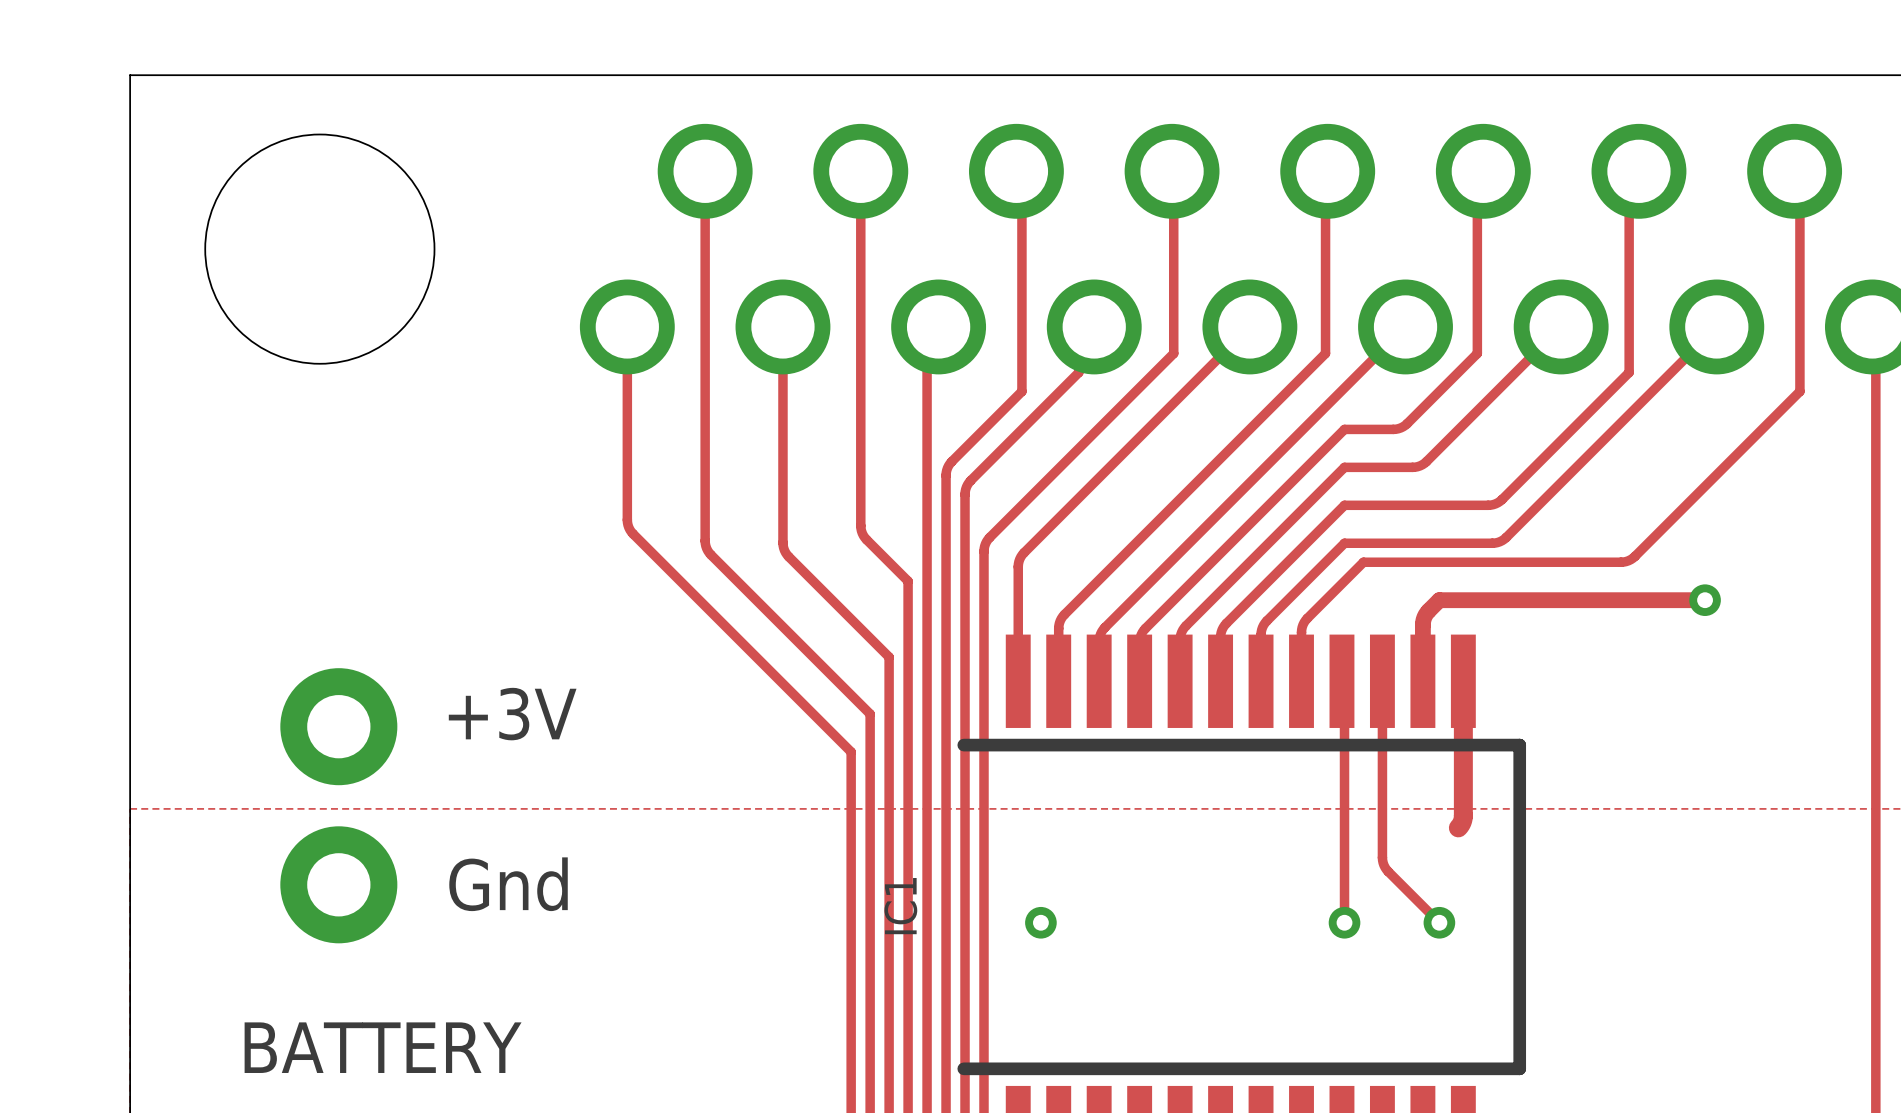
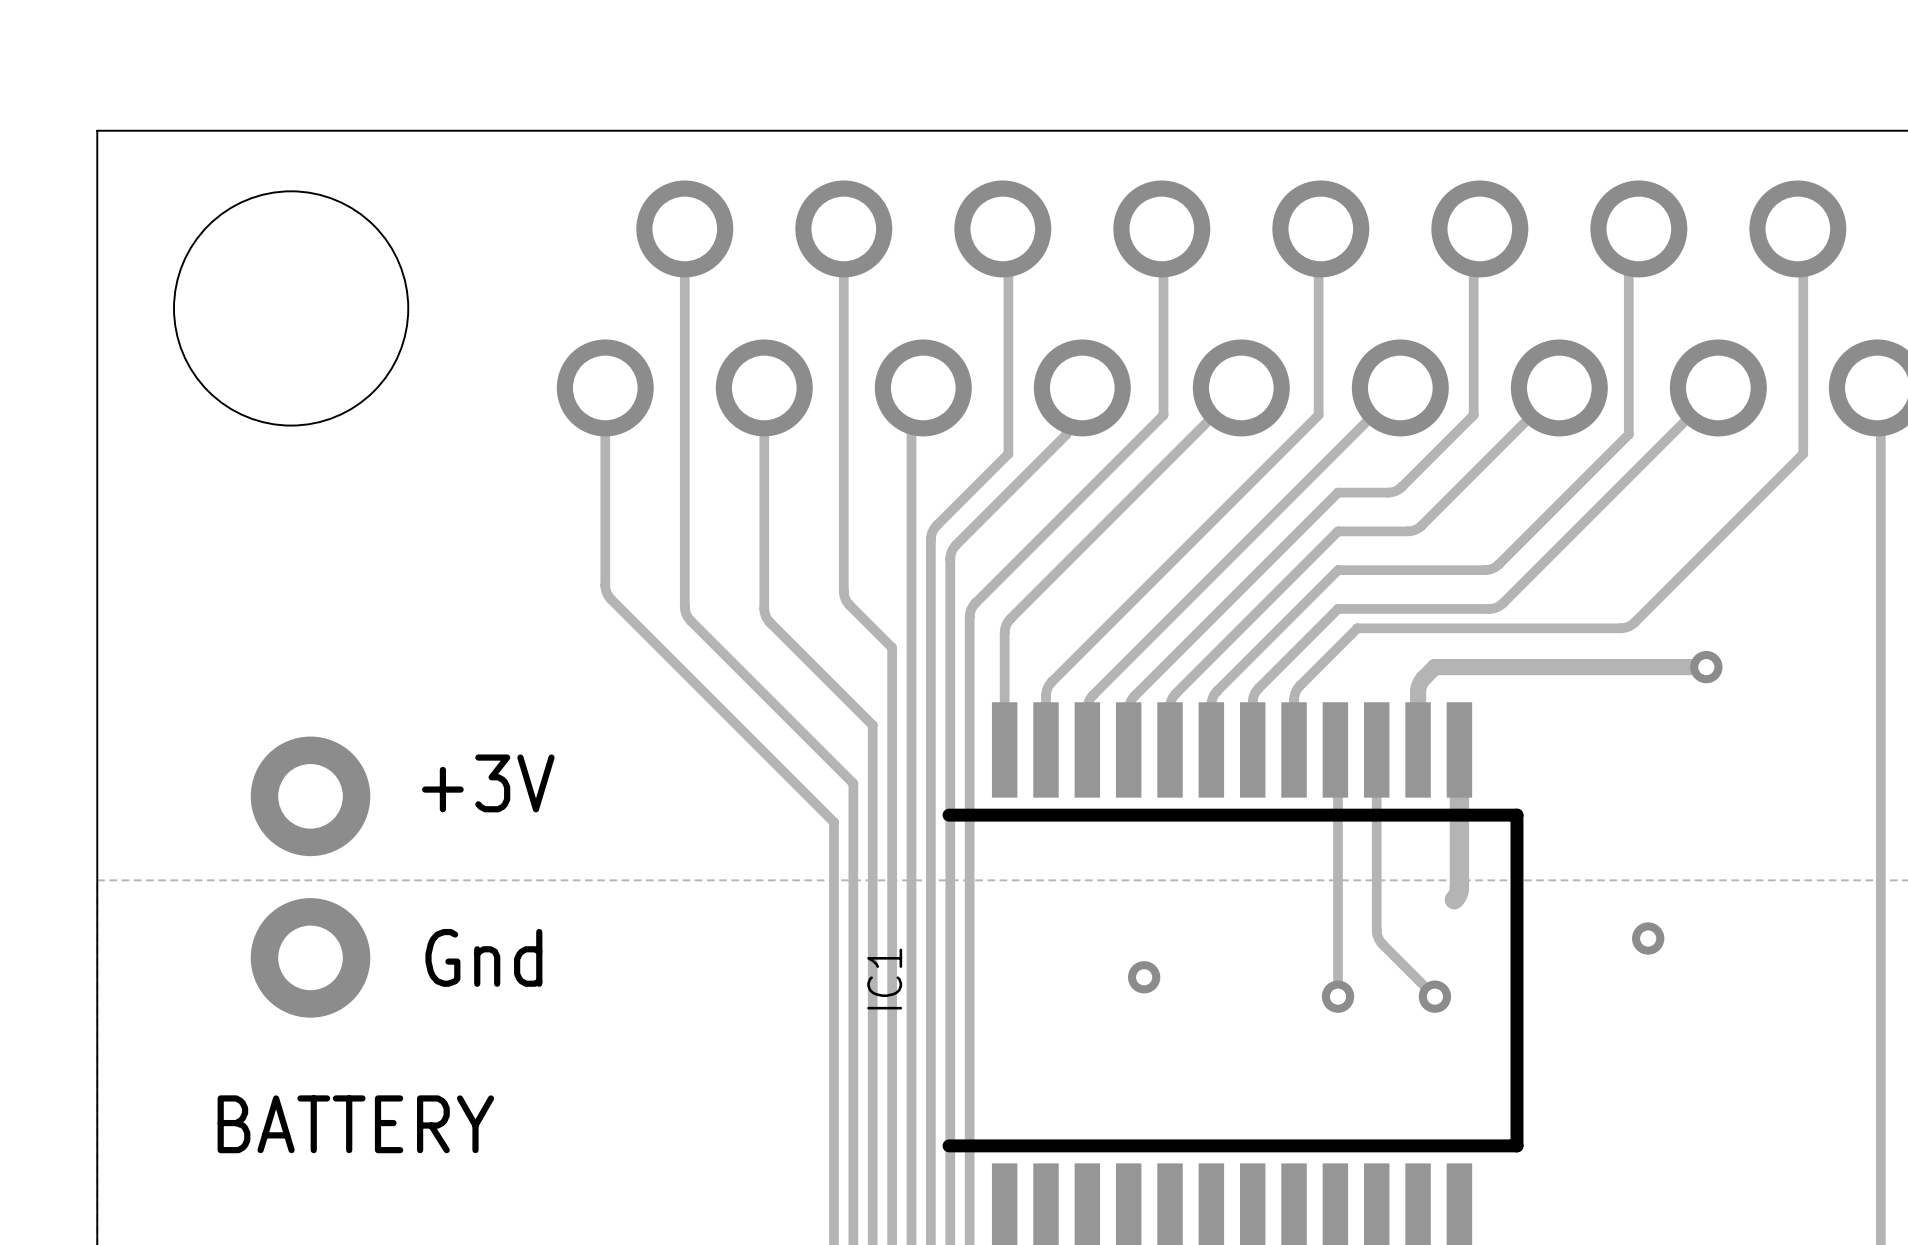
via: none -> (1648, 938)
via position: (1040, 922) -> (1144, 977)

